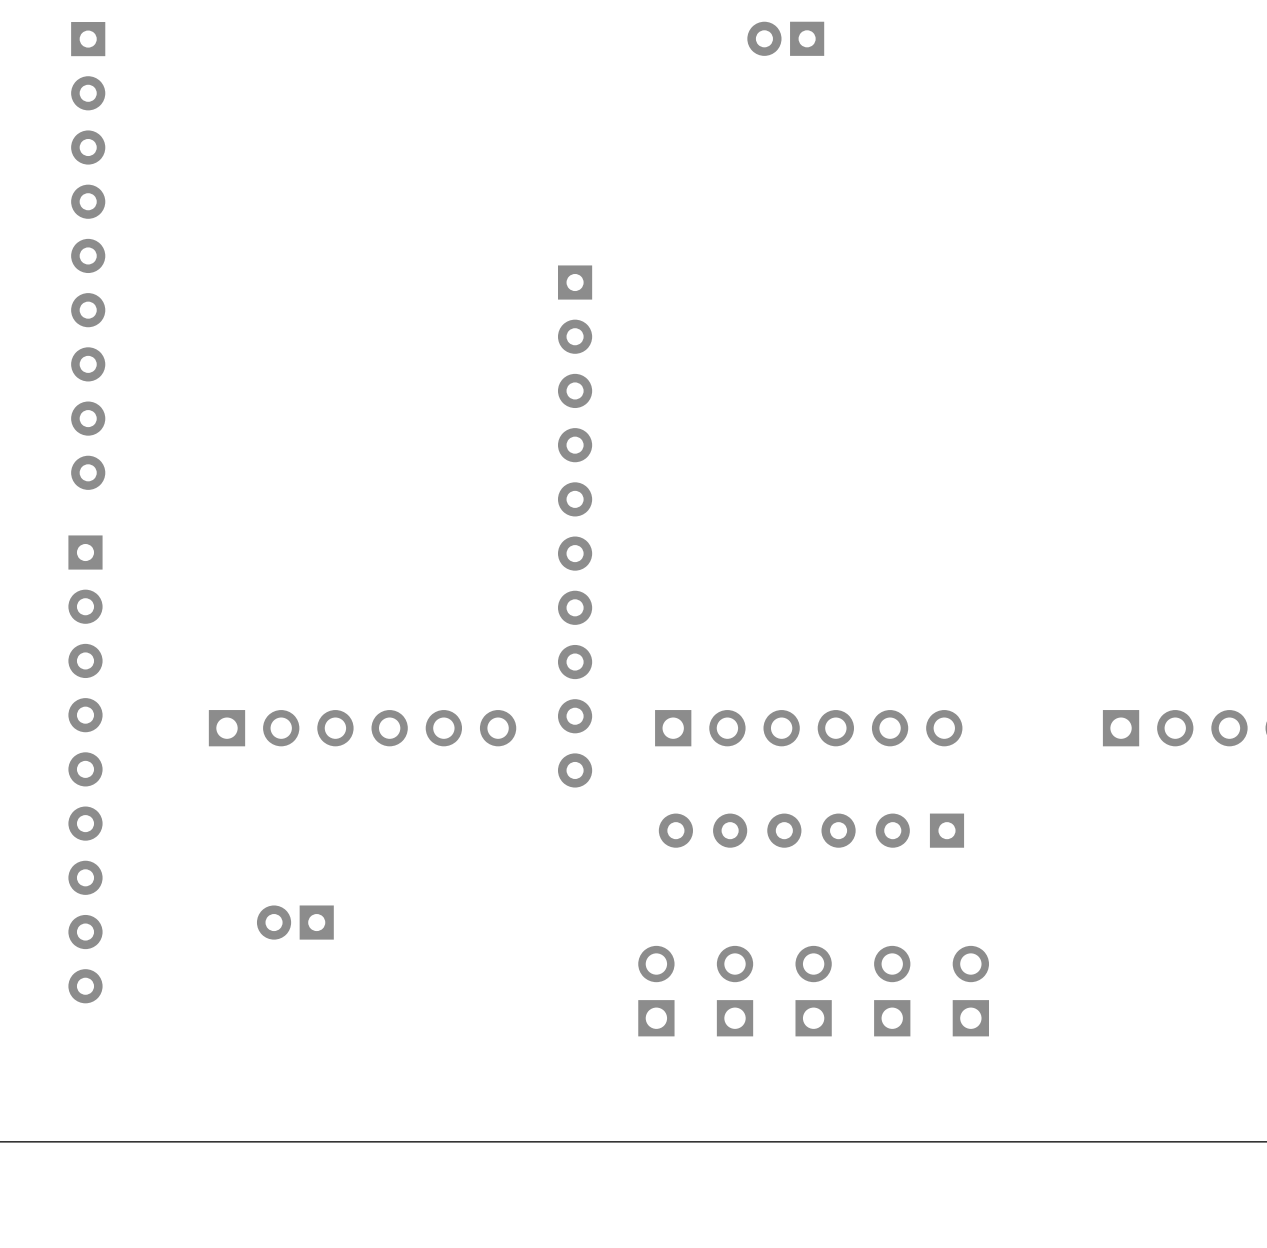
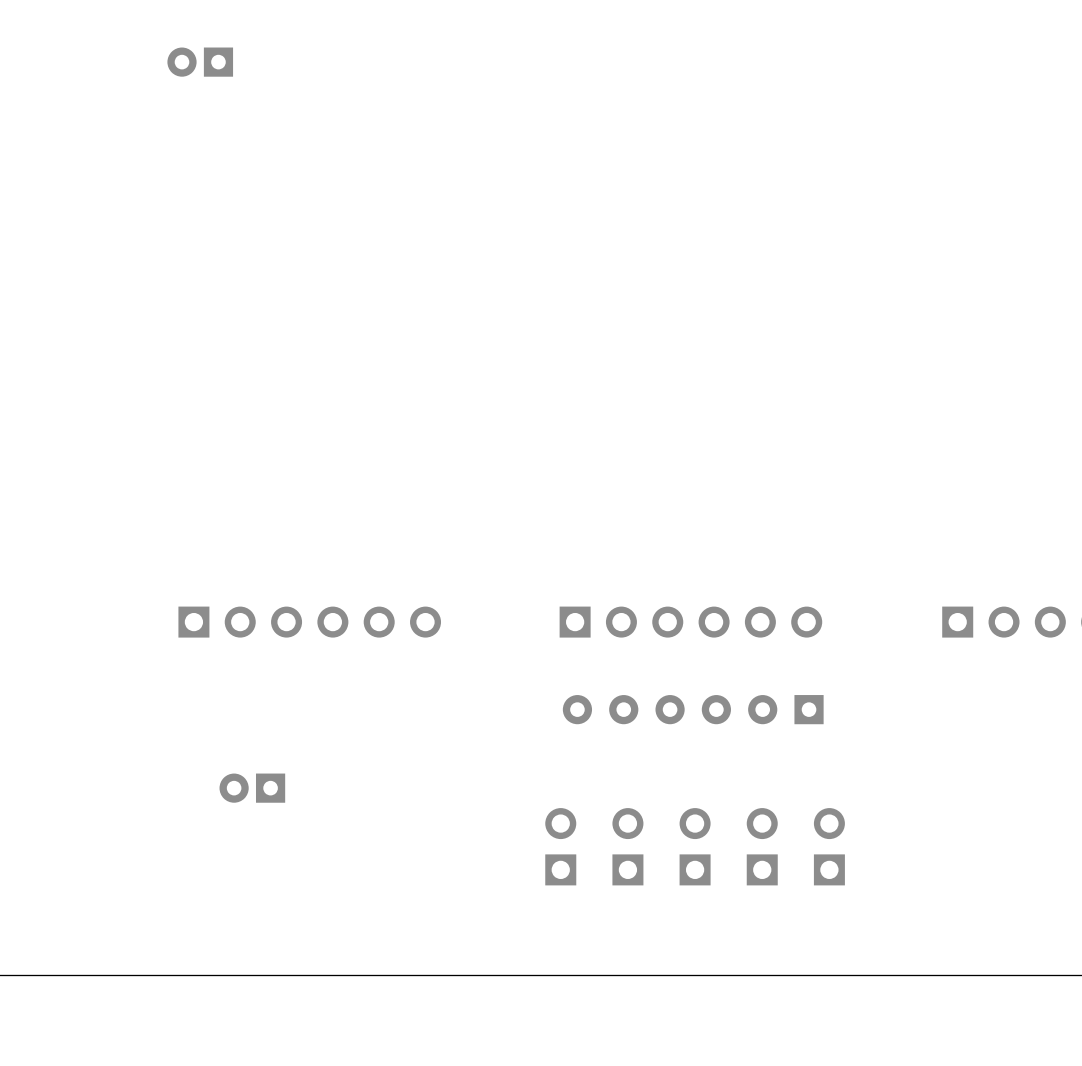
part: (785, 38) -> none
part: none -> (200, 62)
part: (88, 255) -> none
part: (575, 526) -> none
part: (85, 769) -> none

